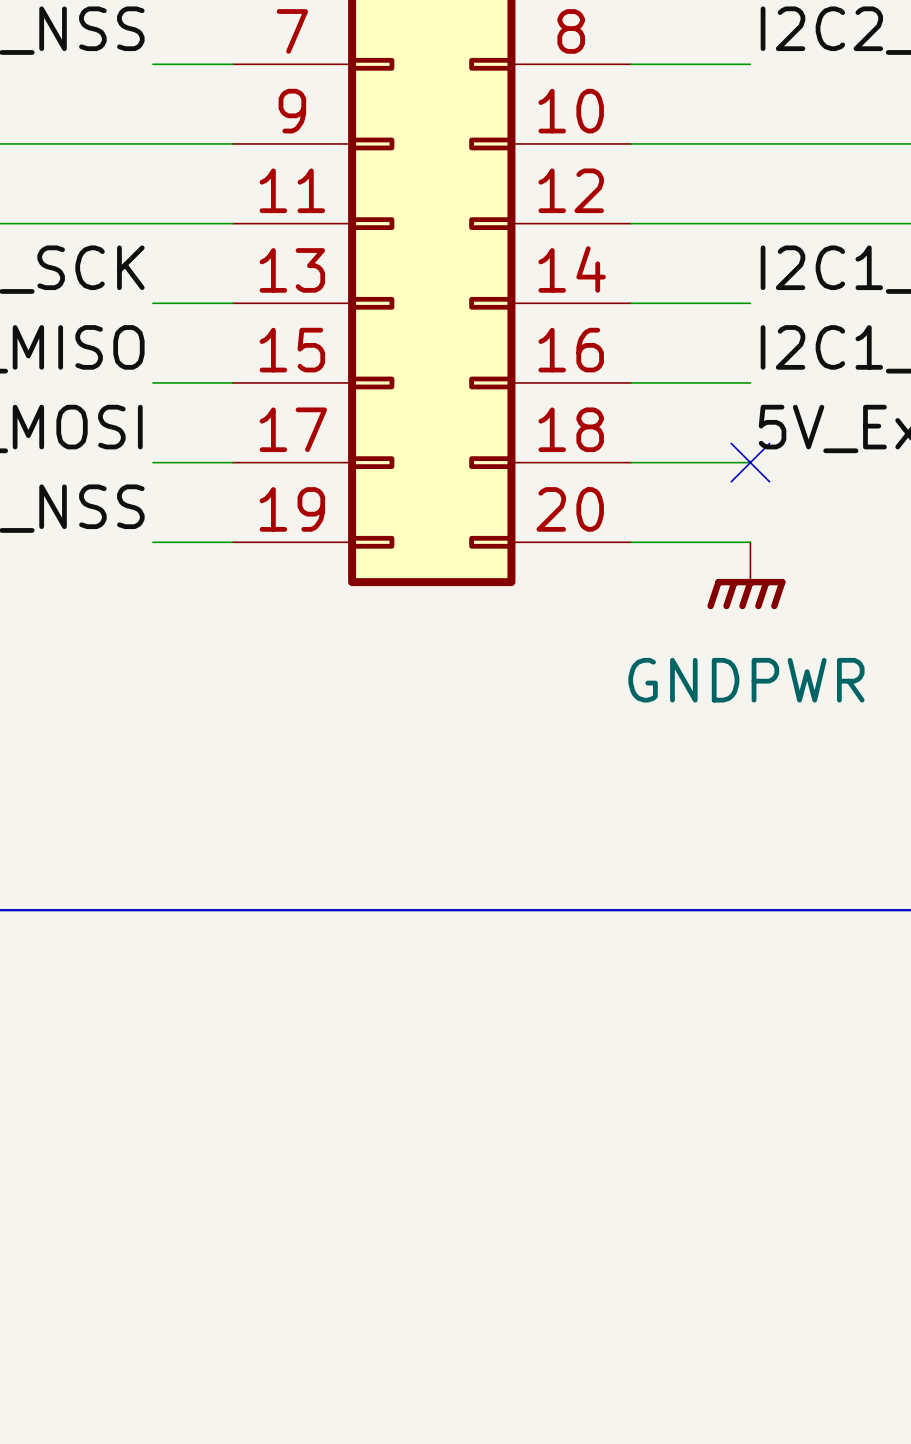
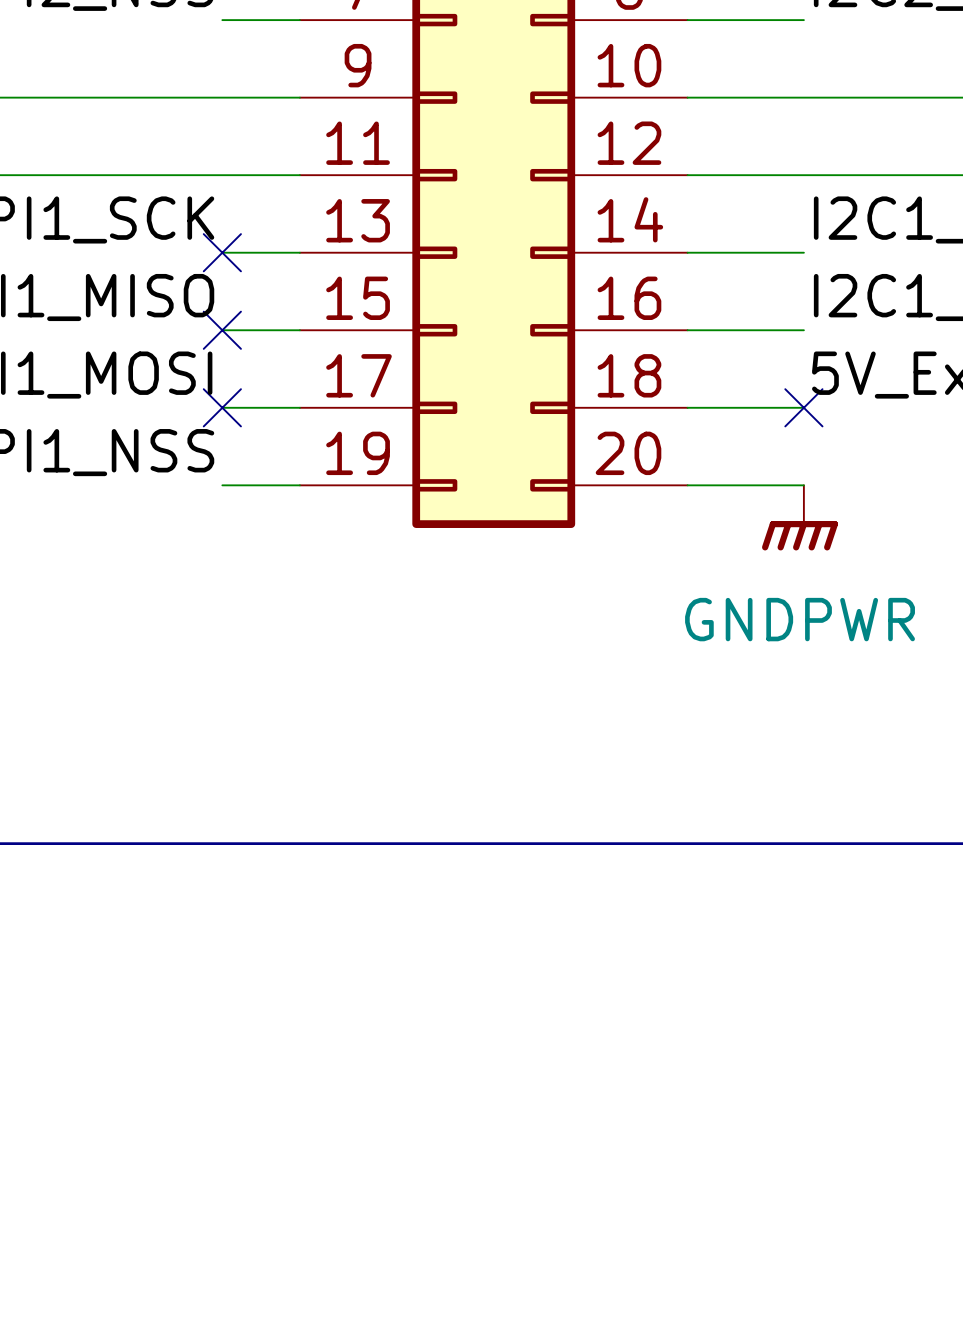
no-connect mark: none -> (222, 252)
no-connect mark: none -> (222, 330)
no-connect mark: none -> (222, 407)

